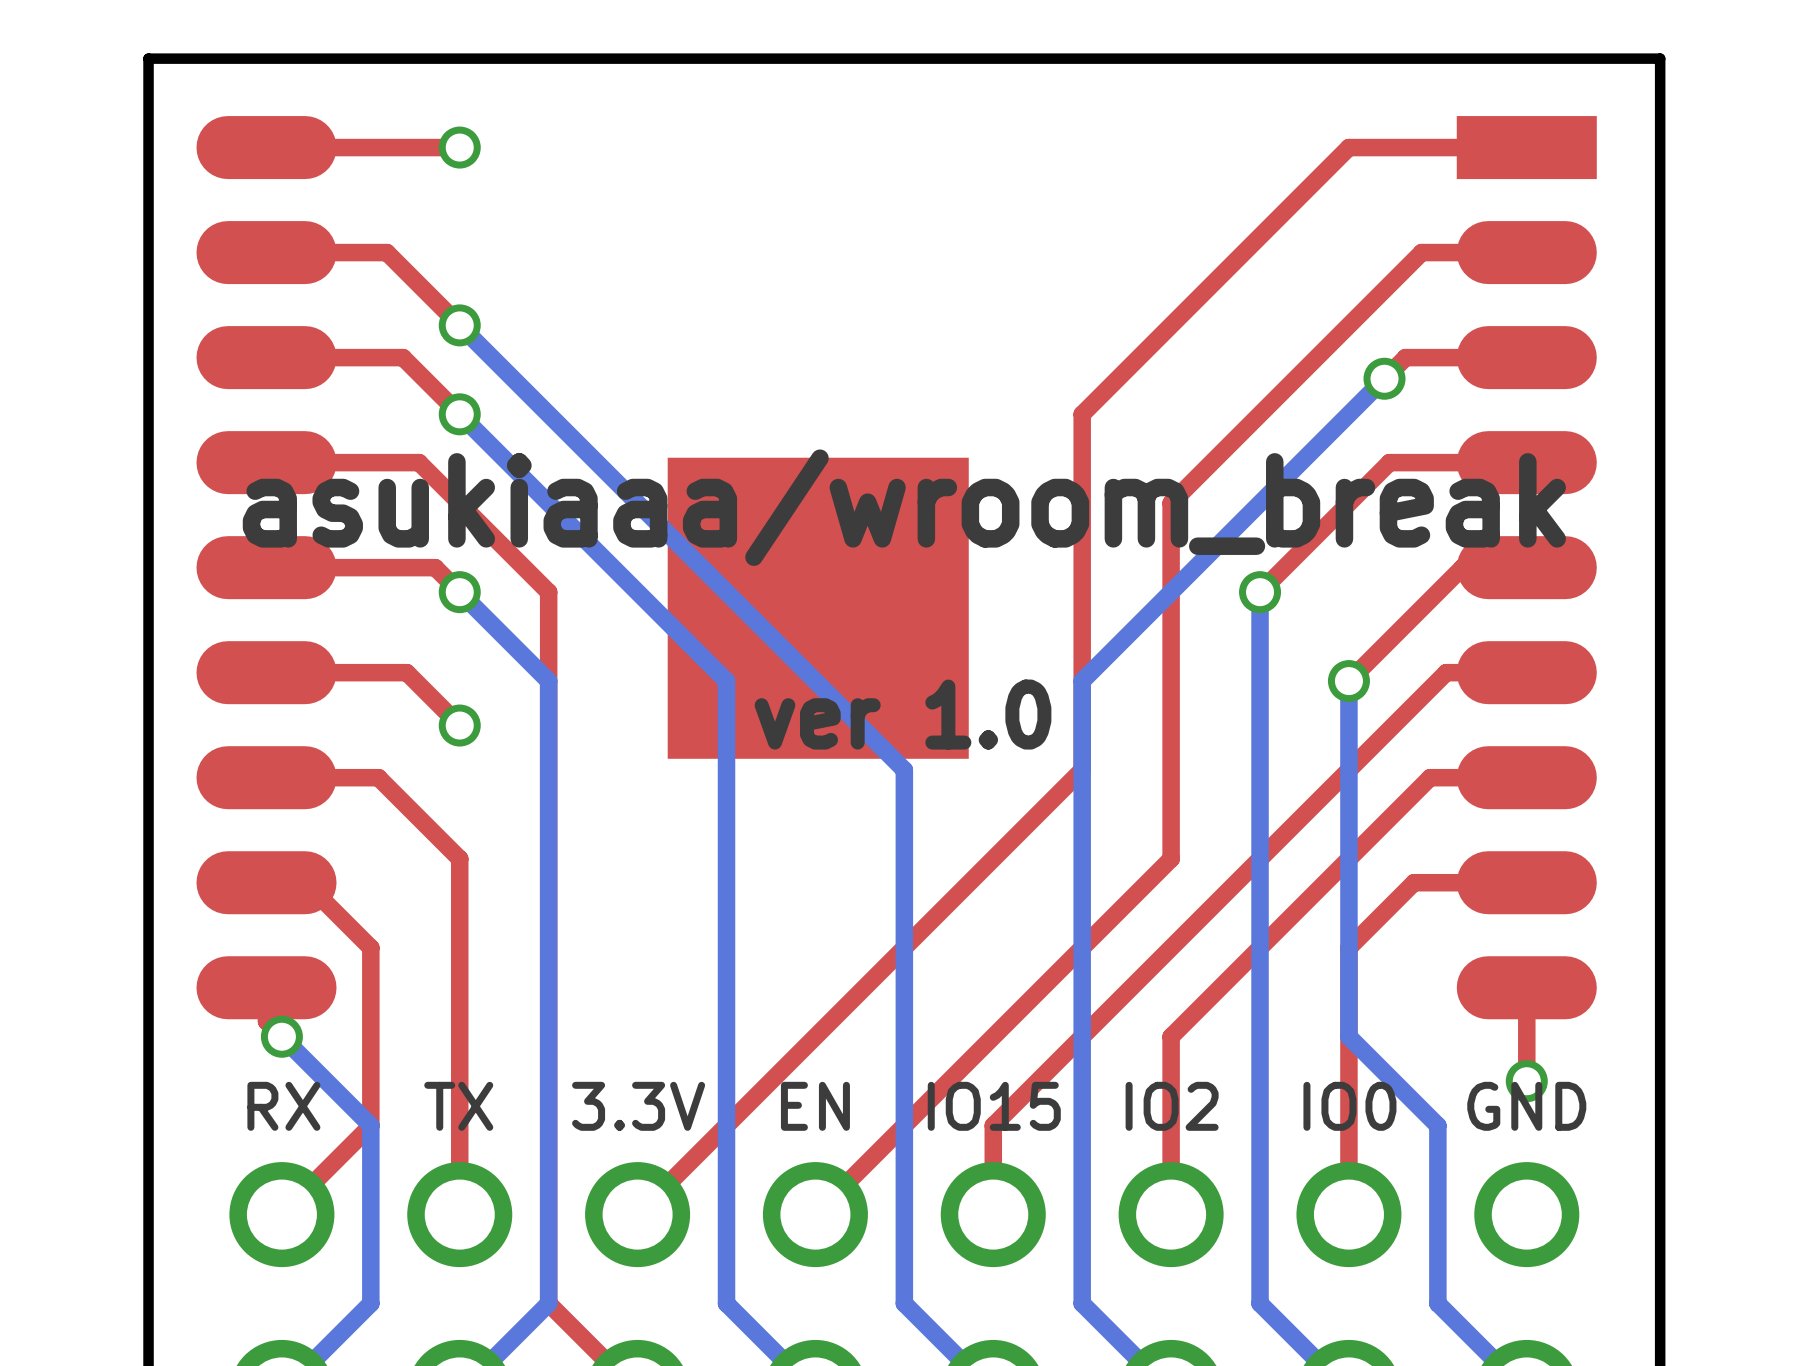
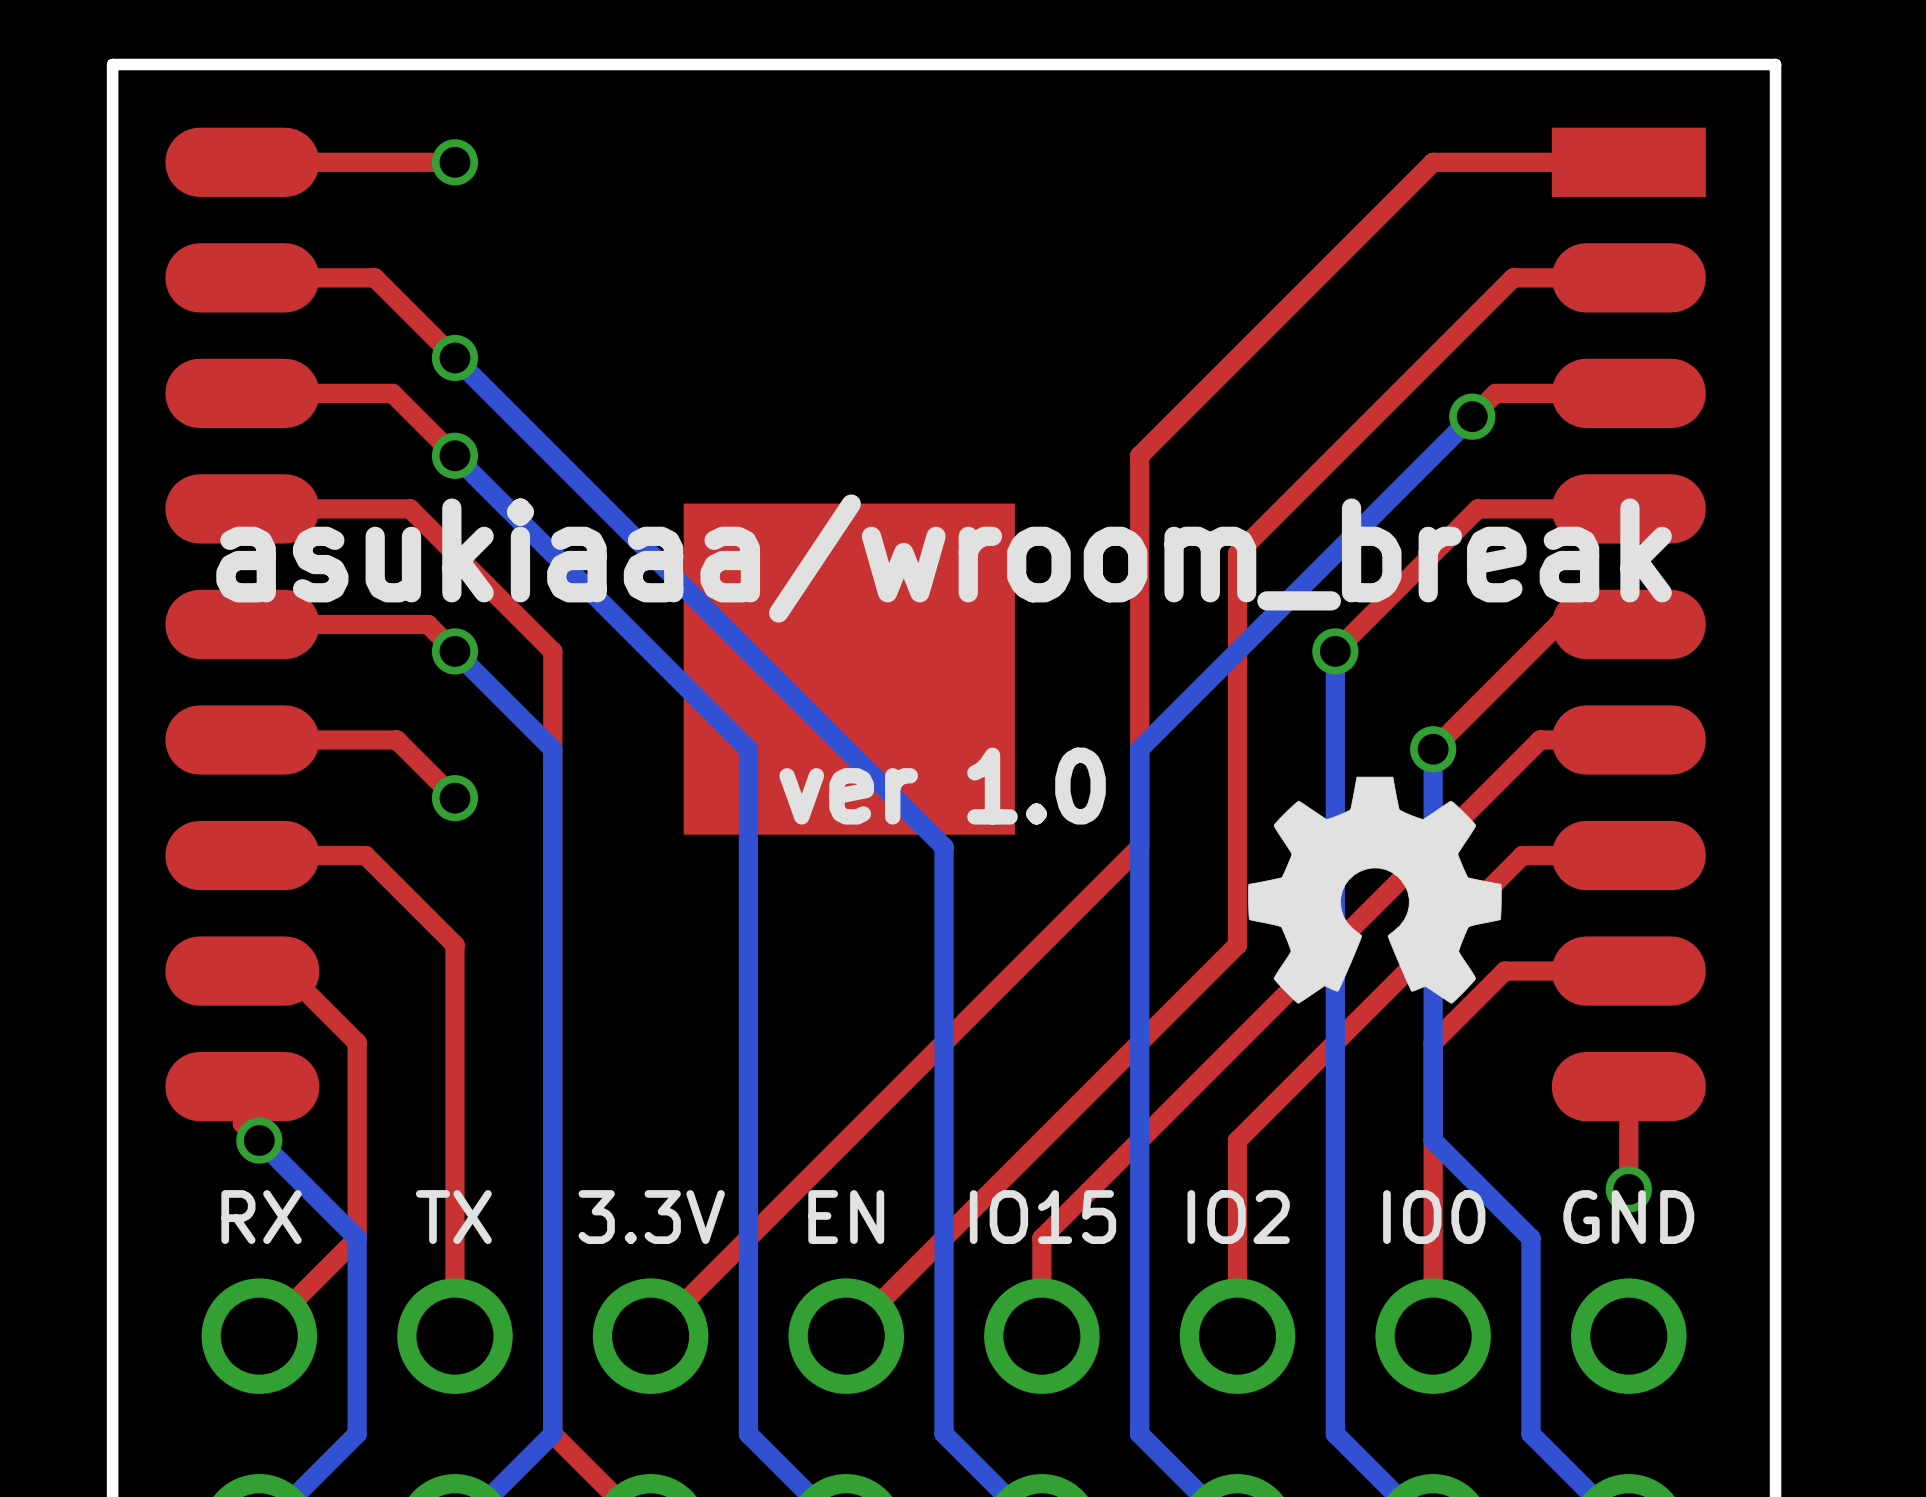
drawing: none -> [1248, 776, 1502, 1004]

